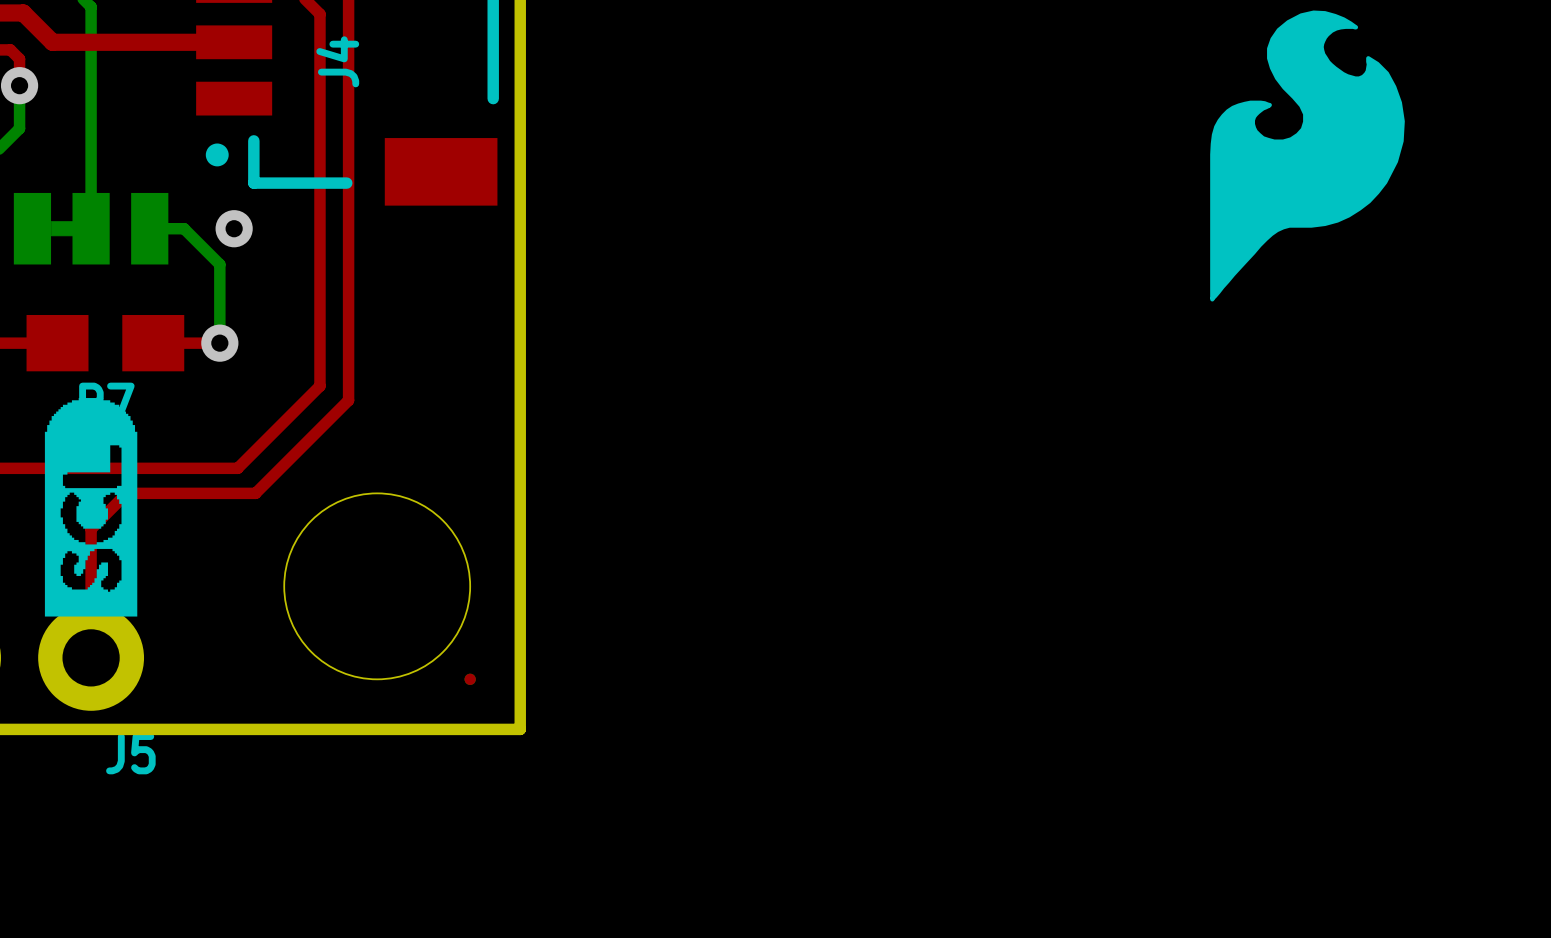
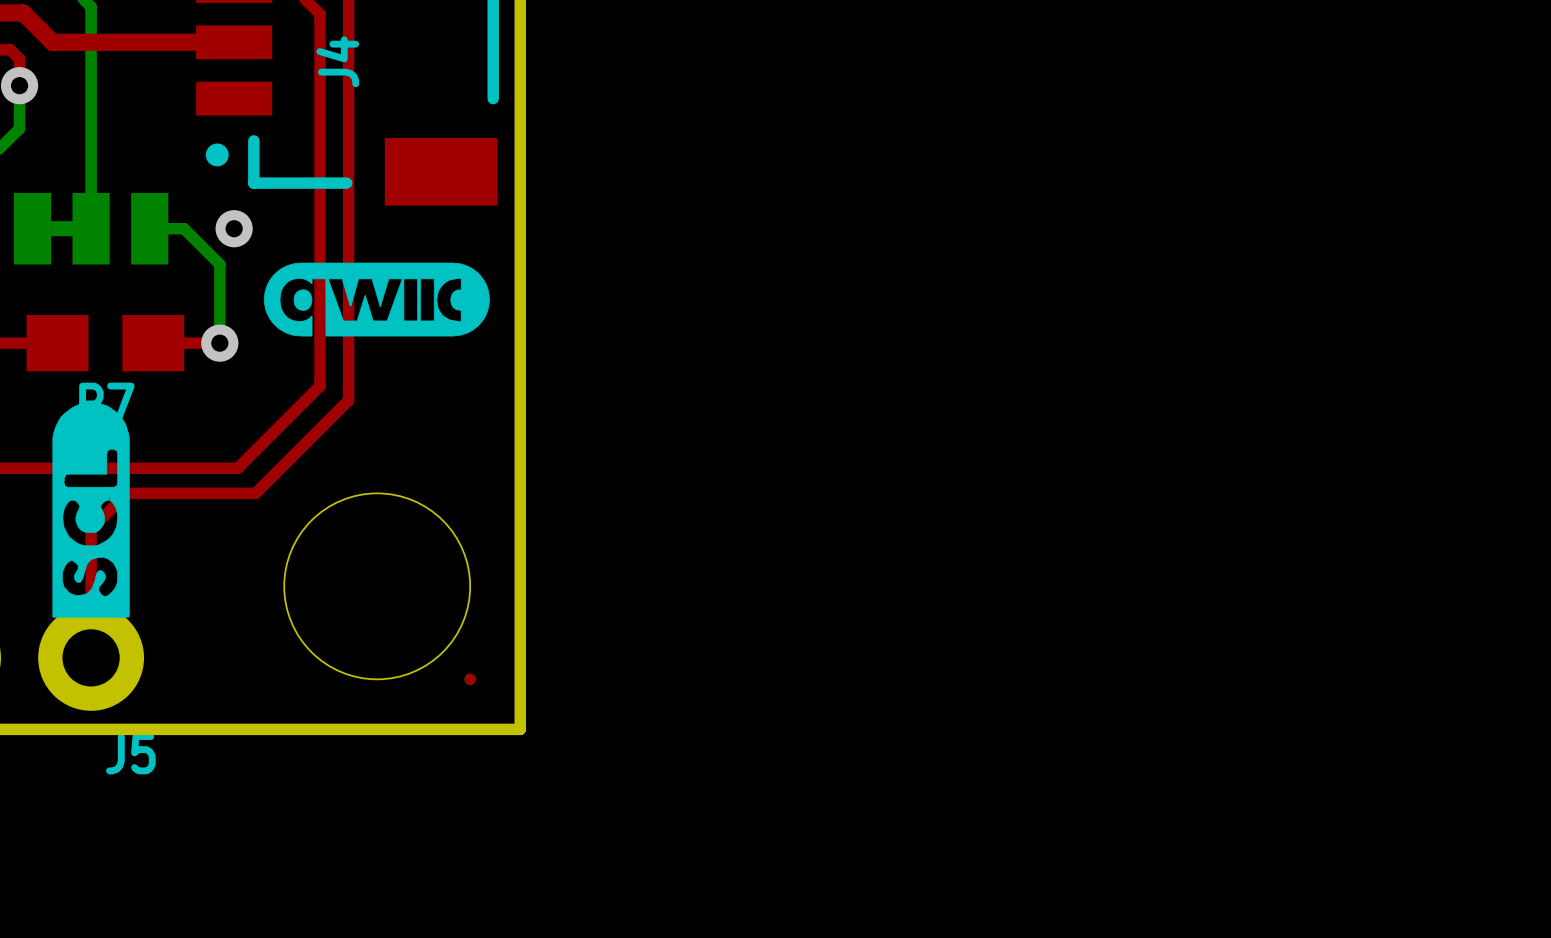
drawing: [1210, 10, 1405, 302] -> none
drawing: none -> [263, 262, 490, 337]
drawing shape: [44, 398, 138, 617] -> [52, 402, 130, 618]

